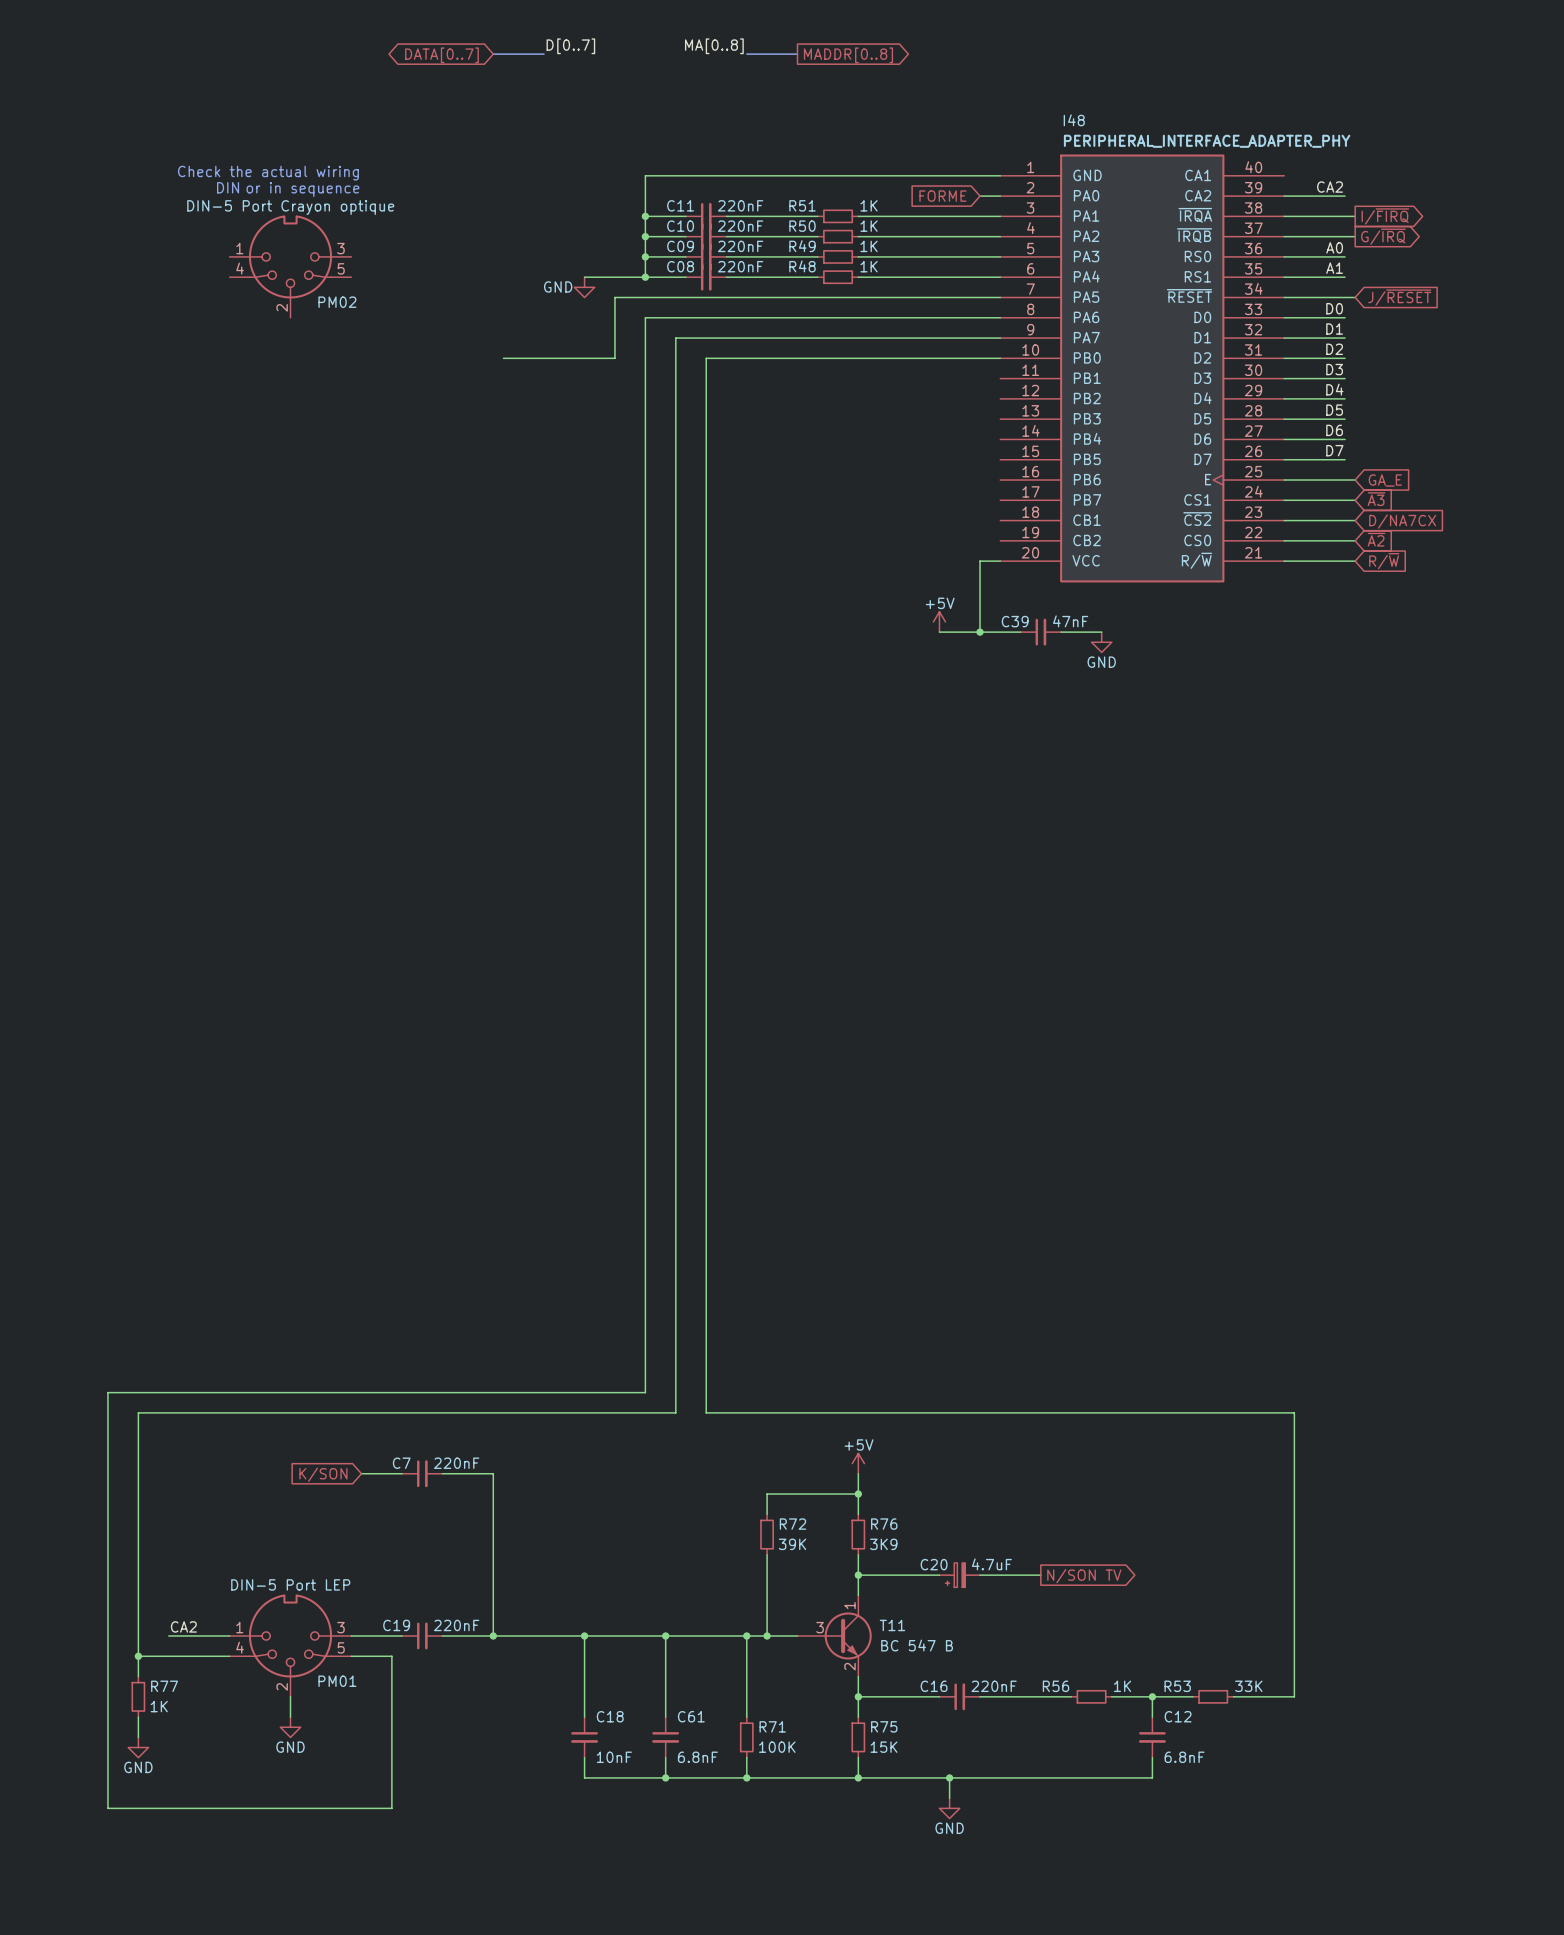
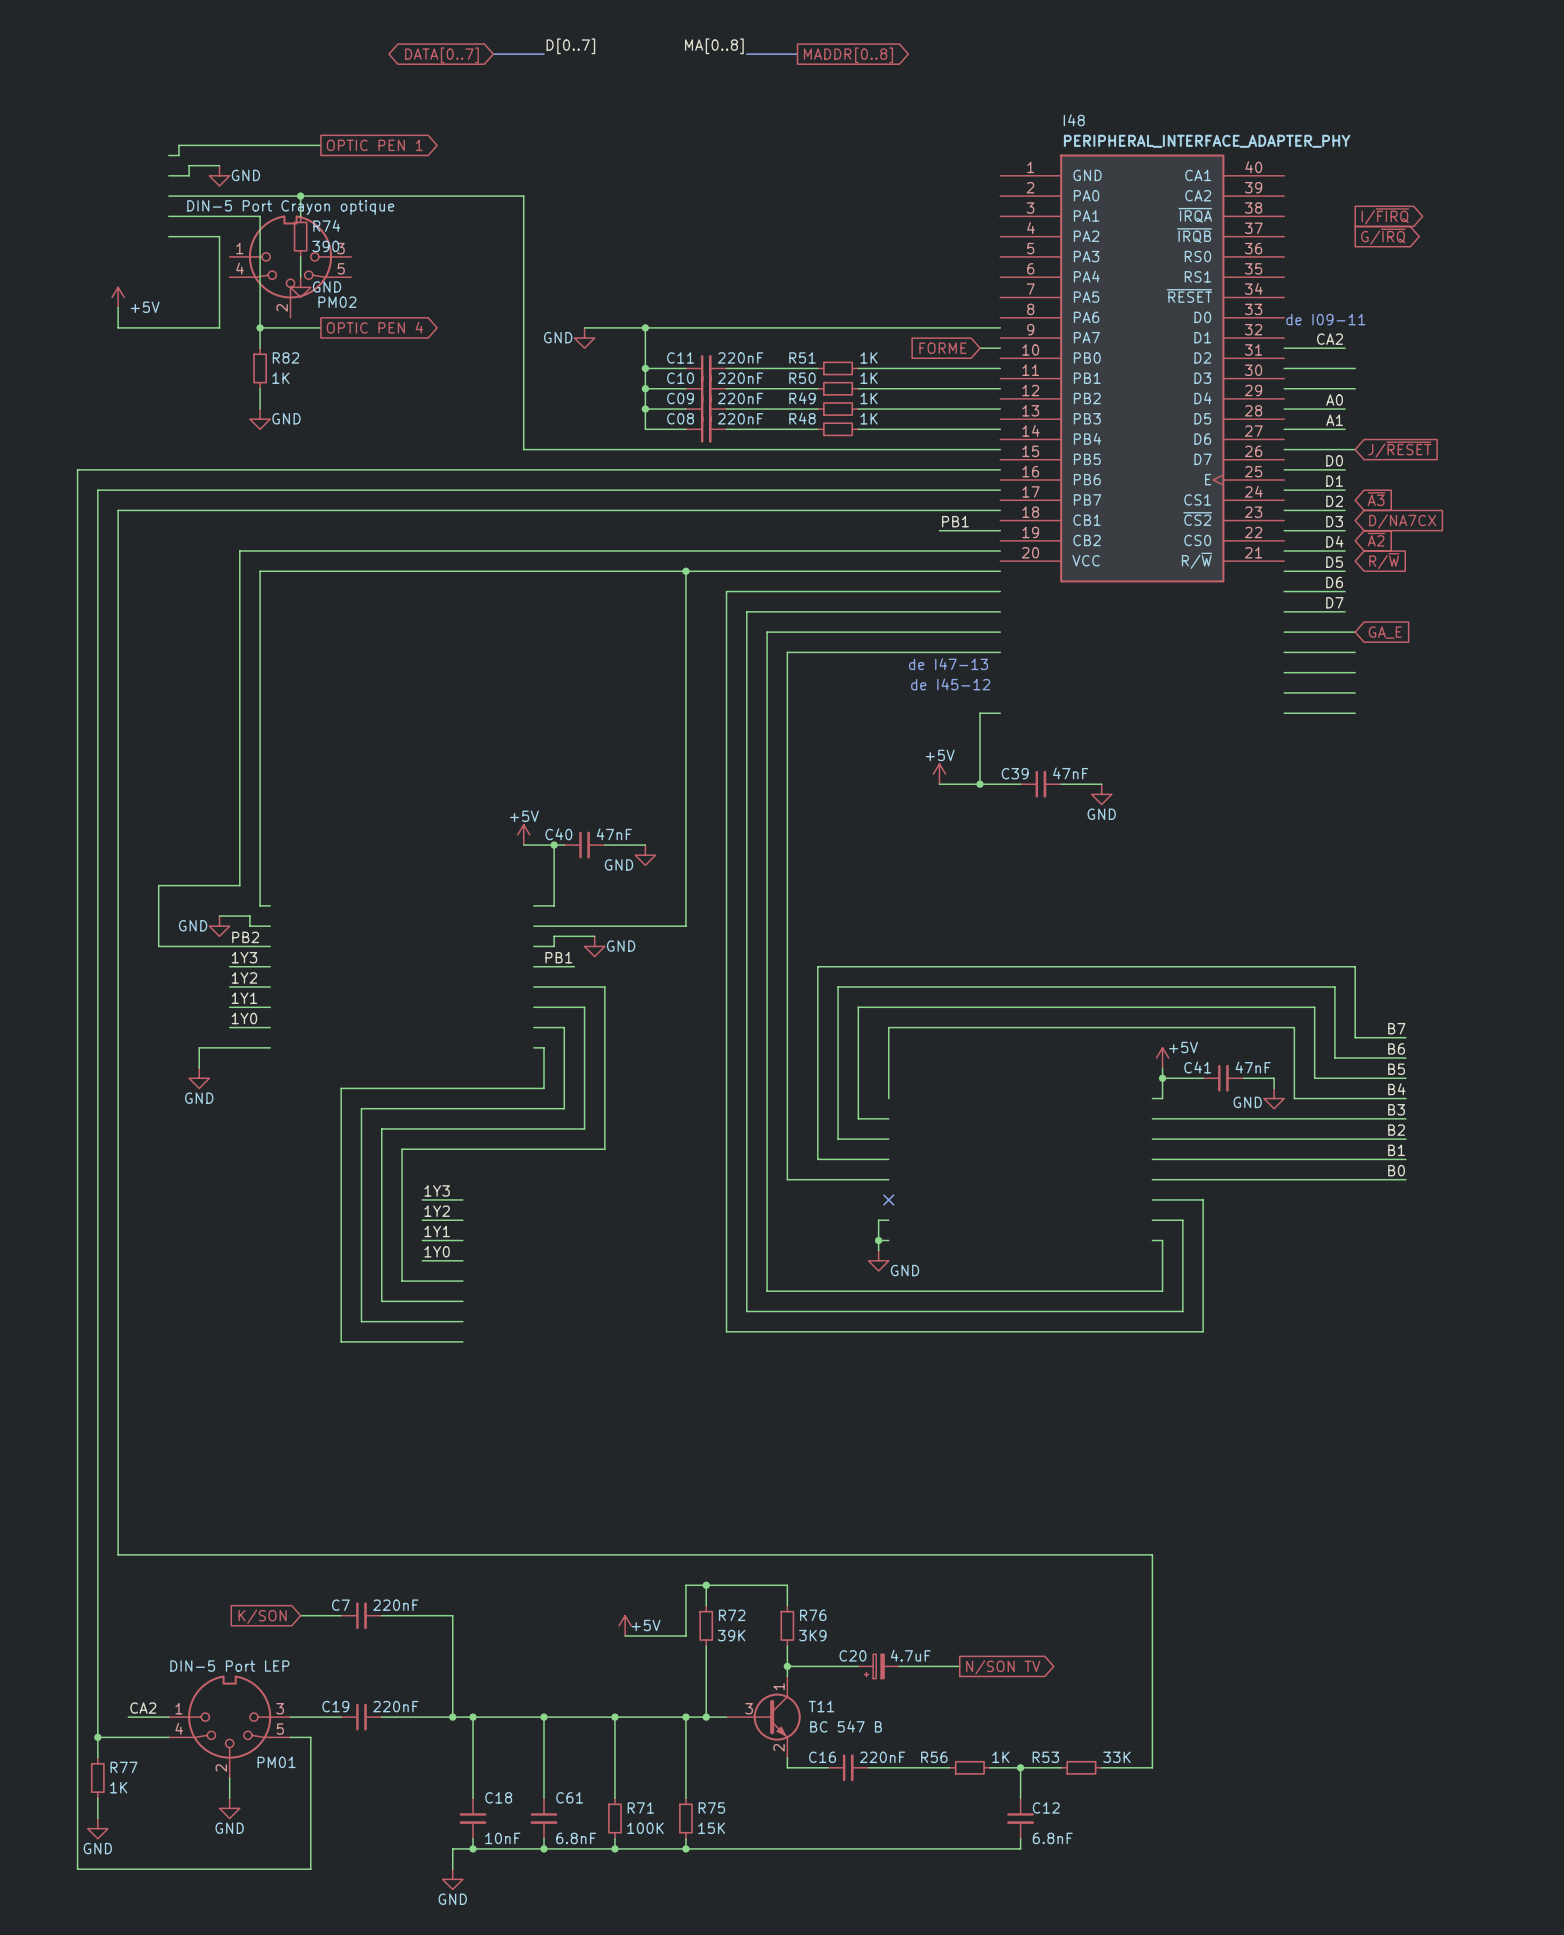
wire: none -> (320, 145) (178, 145) (178, 155) (168, 155)
global label: none -> OPTIC PEN 1 (374, 145)
wire: none -> (219, 165) (189, 165) (189, 175) (168, 175)
text: Check the actual wiring (268, 173) -> none
power symbol: none -> GND (219, 175)
wire: (1000, 175) (645, 175) (645, 277) -> none
label position: CA2 (1330, 187) -> CA2 (1330, 339)
text: DIN or in sequence (288, 189) -> none
wire: none -> (168, 196) (523, 196) (523, 449) (1000, 449)
wire: none -> (300, 196) (300, 216)
junction: none -> (300, 196)
global label position: FORME (942, 196) -> FORME (942, 348)
wire: (980, 196) (1000, 196) -> (980, 348) (1000, 348)
wire: (1284, 196) (1345, 196) -> (1284, 348) (1345, 348)
wire: none -> (168, 216) (260, 216) (260, 348)
wire: (645, 216) (685, 216) -> (645, 368) (685, 368)
junction: (645, 216) -> none
C11 position: (706, 216) -> (706, 368)
wire: (726, 216) (817, 216) -> (726, 368) (817, 368)
R51 position: (838, 216) -> (838, 368)
wire: (858, 216) (1000, 216) -> (858, 368) (1000, 368)
wire: (1284, 216) (1355, 216) -> (1284, 368) (1355, 368)
wire: none -> (168, 236) (219, 236) (219, 327) (118, 327) (118, 307)
R74: none -> 390 (300, 236)
wire: (645, 236) (685, 236) -> (645, 388) (685, 388)
junction: (645, 236) -> none
C10 position: (706, 236) -> (706, 388)
wire: (726, 236) (817, 236) -> (726, 388) (817, 388)
R50 position: (838, 236) -> (838, 388)
wire: (858, 236) (1000, 236) -> (858, 388) (1000, 388)
wire: (1284, 236) (1355, 236) -> (1284, 388) (1355, 388)
label position: A0 (1334, 247) -> A0 (1334, 399)
wire: none -> (300, 256) (300, 277)
wire: (645, 256) (685, 256) -> (645, 409) (685, 409)
junction: (645, 256) -> none
C09 position: (706, 256) -> (706, 409)
wire: (726, 256) (817, 256) -> (726, 409) (817, 409)
R49 position: (838, 256) -> (838, 409)
wire: (858, 256) (1000, 256) -> (858, 409) (1000, 409)
wire: (1284, 256) (1345, 256) -> (1284, 409) (1345, 409)
label position: A1 (1334, 268) -> A1 (1334, 420)
wire: (584, 277) (685, 277) -> none
junction: (645, 277) -> none
C08 position: (706, 277) -> (706, 429)
wire: (726, 277) (817, 277) -> (726, 429) (817, 429)
R48 position: (838, 277) -> (838, 429)
wire: (858, 277) (1000, 277) -> (858, 429) (1000, 429)
wire: (1284, 277) (1345, 277) -> (1284, 429) (1345, 429)
power symbol: none -> GND (300, 287)
power symbol position: GND (584, 287) -> GND (584, 338)
power symbol: none -> +5V (118, 297)
wire: (1000, 297) (614, 297) (614, 358) (503, 358) -> none
wire: (1284, 297) (1355, 297) -> (1284, 449) (1355, 449)
global label position: J/~{RESET} (1399, 297) -> J/~{RESET} (1399, 449)
label position: D0 (1334, 308) -> D0 (1334, 460)
wire: (1000, 317) (645, 317) (645, 327) -> none
wire: (1284, 317) (1345, 317) -> (1284, 469) (1345, 469)
text: none -> de I09-11 (1325, 319)
wire: none -> (260, 327) (320, 327)
junction: none -> (260, 327)
global label: none -> OPTIC PEN 4 (375, 327)
wire: none -> (584, 327) (1000, 327)
junction: none -> (645, 327)
label position: D1 (1334, 329) -> D1 (1334, 481)
wire: (1000, 338) (675, 338) (675, 1412) (138, 1412) (138, 1676) -> none
wire: (1284, 338) (1345, 338) -> (1284, 490) (1345, 490)
label position: D2 (1334, 349) -> D2 (1334, 501)
wire: (1000, 358) (706, 358) (706, 1412) (1294, 1412) (1294, 1696) (1233, 1696) -> none
wire: (1284, 358) (1345, 358) -> (1284, 510) (1345, 510)
R82: none -> 1K (260, 368)
junction: none -> (645, 368)
label position: D3 (1334, 369) -> D3 (1334, 521)
wire: (1284, 378) (1345, 378) -> (1284, 530) (1345, 530)
wire: none -> (260, 388) (260, 409)
junction: none -> (645, 388)
label position: D4 (1334, 389) -> D4 (1334, 541)
wire: (1284, 398) (1345, 398) -> (1284, 550) (1345, 550)
junction: none -> (645, 409)
label position: D5 (1334, 410) -> D5 (1334, 562)
power symbol: none -> GND (260, 419)
wire: (1284, 419) (1345, 419) -> (1284, 571) (1345, 571)
wire: (645, 429) (645, 1392) (107, 1392) (107, 1808) (391, 1808) (391, 1656) (351, 1656) -> (645, 429) (685, 429)
label position: D6 (1334, 430) -> D6 (1334, 582)
wire: (1284, 439) (1345, 439) -> (1284, 591) (1345, 591)
label position: D7 (1334, 450) -> D7 (1334, 602)
wire: (1284, 459) (1345, 459) -> (1284, 611) (1345, 611)
wire: none -> (1000, 469) (77, 469) (77, 1869) (310, 1869) (310, 1737) (290, 1737)
wire: (1284, 480) (1355, 480) -> (1284, 632) (1355, 632)
global label position: GA_E (1385, 480) -> GA_E (1385, 632)
wire: none -> (1000, 490) (97, 490) (97, 1757)
wire: (1284, 500) (1355, 500) -> (1284, 652) (1355, 652)
wire: none -> (1000, 510) (118, 510) (118, 1554) (1152, 1554) (1152, 1696)
wire: (1284, 520) (1355, 520) -> (1284, 672) (1355, 672)
label: none -> PB1 (955, 521)
wire: none -> (939, 530) (1000, 530)
wire: (1284, 540) (1355, 540) -> (1284, 692) (1355, 692)
wire: none -> (1000, 550) (239, 550) (239, 885) (158, 885) (158, 946) (270, 946)
wire: (1000, 561) (980, 561) (980, 632) -> (1000, 713) (980, 713) (980, 784)
wire: (1284, 561) (1355, 561) -> (1284, 713) (1355, 713)
wire: none -> (685, 571) (685, 926) (533, 926)
junction: none -> (685, 571)
wire: none -> (1000, 571) (260, 571) (260, 905) (270, 905)
wire: none -> (1000, 591) (726, 591) (726, 1331) (1203, 1331) (1203, 1199) (1152, 1199)
wire: none -> (1000, 611) (746, 611) (746, 1311) (1182, 1311) (1182, 1220) (1152, 1220)
power symbol position: +5V (939, 621) -> +5V (939, 774)
wire: none -> (939, 632) (767, 632) (767, 1291) (1162, 1291) (1162, 1240) (1152, 1240)
junction: (980, 632) -> none
wire: (1000, 632) (1020, 632) -> none
C39 position: (1040, 632) -> (1040, 784)
wire: (1061, 632) (1101, 632) -> (1061, 784) (1101, 784)
power symbol position: GND (1101, 642) -> GND (1101, 794)
wire: none -> (1000, 652) (787, 652) (787, 1179) (888, 1179)
text: none -> de I47-13 (948, 664)
text: none -> de I45-12 (950, 684)
wire: none -> (939, 784) (1020, 784)
junction: none -> (980, 784)
power symbol: none -> +5V (523, 834)
wire: none -> (523, 845) (564, 845)
wire: none -> (554, 845) (554, 905) (533, 905)
junction: none -> (554, 845)
C40: none -> 47nF (584, 845)
wire: none -> (604, 845) (645, 845)
power symbol: none -> GND (645, 855)
wire: none -> (219, 916) (249, 916) (249, 926) (270, 926)
power symbol: none -> GND (219, 926)
wire: none -> (594, 936) (554, 936) (554, 946) (533, 946)
label: none -> PB2 (245, 937)
power symbol: none -> GND (594, 946)
label: none -> 1Y3 (244, 957)
label: none -> PB1 (558, 957)
wire: none -> (229, 966) (270, 966)
wire: none -> (533, 966) (574, 966)
label: none -> 1Y2 (244, 977)
wire: none -> (229, 987) (270, 987)
wire: none -> (533, 987) (604, 987) (604, 1149) (402, 1149) (402, 1281) (462, 1281)
label: none -> 1Y1 (244, 998)
wire: none -> (229, 1007) (270, 1007)
wire: none -> (533, 1007) (584, 1007) (584, 1128) (381, 1128) (381, 1301) (462, 1301)
label: none -> 1Y0 (244, 1018)
wire: none -> (229, 1027) (270, 1027)
wire: none -> (533, 1027) (564, 1027) (564, 1108) (361, 1108) (361, 1321) (462, 1321)
label: none -> B7 (1396, 1028)
wire: none -> (1405, 1037) (1355, 1037) (1355, 966) (817, 966) (817, 1159) (888, 1159)
wire: none -> (270, 1047) (199, 1047) (199, 1068)
wire: none -> (533, 1047) (543, 1047) (543, 1088) (341, 1088) (341, 1341) (462, 1341)
label: none -> B6 (1396, 1048)
power symbol: none -> +5V (1162, 1058)
wire: none -> (1405, 1058) (1334, 1058) (1334, 987) (838, 987) (838, 1139) (888, 1139)
wire: none -> (1162, 1068) (1162, 1098) (1152, 1098)
label: none -> B5 (1396, 1069)
power symbol: none -> GND (199, 1078)
wire: none -> (1162, 1078) (1203, 1078)
junction: none -> (1162, 1078)
C41: none -> 47nF (1223, 1078)
wire: none -> (1243, 1078) (1274, 1078) (1274, 1088)
wire: none -> (1405, 1078) (1314, 1078) (1314, 1007) (858, 1007) (858, 1118) (888, 1118)
label: none -> B4 (1396, 1089)
wire: none -> (888, 1098) (888, 1027) (1294, 1027) (1294, 1098) (1405, 1098)
power symbol: none -> GND (1274, 1098)
label: none -> B3 (1396, 1109)
wire: none -> (1152, 1118) (1405, 1118)
label: none -> B2 (1396, 1130)
wire: none -> (1152, 1139) (1405, 1139)
label: none -> B1 (1396, 1150)
wire: none -> (1152, 1159) (1405, 1159)
label: none -> B0 (1396, 1170)
wire: none -> (1152, 1179) (1405, 1179)
label: none -> 1Y3 (437, 1190)
wire: none -> (422, 1199) (462, 1199)
no-connect mark: none -> (888, 1199)
label: none -> 1Y2 (437, 1211)
wire: none -> (422, 1220) (462, 1220)
wire: none -> (888, 1220) (878, 1220) (878, 1250)
label: none -> 1Y1 (437, 1231)
wire: none -> (422, 1240) (462, 1240)
wire: none -> (878, 1240) (888, 1240)
junction: none -> (878, 1240)
label: none -> 1Y0 (437, 1251)
wire: none -> (422, 1260) (462, 1260)
power symbol: none -> GND (878, 1260)
power symbol: +5V (858, 1463) -> none
wire: (361, 1473) (402, 1473) -> (300, 1615) (341, 1615)
C7 position: (422, 1473) -> (361, 1615)
wire: (442, 1473) (493, 1473) (493, 1635) -> none
wire: (858, 1473) (858, 1514) -> none
global label position: K/SON (323, 1474) -> K/SON (262, 1616)
wire: (858, 1494) (767, 1494) (767, 1514) -> none
junction: (858, 1494) -> none
R72 position: (767, 1534) -> (706, 1625)
R76 position: (858, 1534) -> (787, 1625)
wire: (767, 1554) (767, 1635) -> none
wire: (858, 1554) (858, 1595) -> none
wire: (858, 1575) (939, 1575) -> none
junction: (858, 1575) -> none
C20 position: (959, 1575) -> (878, 1666)
wire: (980, 1575) (1040, 1575) -> (898, 1666) (959, 1666)
global label position: N/SON TV (1084, 1576) -> N/SON TV (1003, 1667)
junction: none -> (706, 1585)
wire: none -> (381, 1615) (452, 1615) (452, 1717)
power symbol: none -> +5V (625, 1625)
label position: CA2 (183, 1626) -> CA2 (143, 1708)
wire: (168, 1635) (229, 1635) -> none
wire: (351, 1635) (402, 1635) -> none
C19 position: (422, 1635) -> (361, 1717)
wire: (442, 1635) (625, 1635) -> none
junction: (493, 1635) -> none
wire: (584, 1635) (584, 1717) -> (543, 1717) (543, 1798)
junction: (584, 1635) -> none
wire: (665, 1635) (665, 1717) -> (614, 1717) (614, 1798)
junction: (665, 1635) -> none
wire: (685, 1635) (797, 1635) -> (685, 1635) (685, 1585) (787, 1585) (787, 1605)
wire: (746, 1635) (746, 1717) -> (685, 1717) (685, 1798)
junction: (746, 1635) -> none
junction: (767, 1635) -> none
T11 position: (834, 1635) -> (763, 1717)
PM01 position: (290, 1645) -> (229, 1726)
wire: none -> (706, 1646) (706, 1717)
wire: none -> (787, 1646) (787, 1676)
wire: (138, 1656) (229, 1656) -> none
junction: (138, 1656) -> none
wire: none -> (787, 1666) (858, 1666)
junction: none -> (787, 1666)
wire: (858, 1676) (858, 1717) -> none
R77 position: (138, 1696) -> (97, 1777)
wire: (290, 1696) (290, 1717) -> (341, 1717) (290, 1717)
wire: (858, 1696) (939, 1696) -> (868, 1767) (949, 1767)
junction: (858, 1696) -> none
C16 position: (959, 1696) -> (848, 1767)
wire: (980, 1696) (1071, 1696) -> none
R56 position: (1091, 1696) -> (969, 1767)
wire: (1111, 1696) (1192, 1696) -> none
junction: (1152, 1696) -> none
R53 position: (1213, 1696) -> (1081, 1767)
C12 name position: C12 (1178, 1716) -> C12 (1046, 1807)
wire: none -> (128, 1717) (168, 1717)
wire: (138, 1717) (138, 1737) -> (97, 1798) (97, 1818)
wire: none -> (381, 1717) (726, 1717)
junction: none -> (452, 1717)
wire: none -> (473, 1717) (473, 1798)
junction: none -> (473, 1717)
junction: none -> (543, 1717)
junction: none -> (614, 1717)
junction: none -> (685, 1717)
junction: none -> (706, 1717)
power symbol: GND (290, 1727) -> none
wire: none -> (97, 1737) (168, 1737)
junction: none -> (97, 1737)
C18 position: (584, 1737) -> (473, 1818)
C61 position: (665, 1737) -> (543, 1818)
R71 position: (746, 1737) -> (614, 1818)
R75 position: (858, 1737) -> (685, 1818)
C12 position: (1152, 1737) -> (1020, 1818)
power symbol: GND (138, 1747) -> none
wire: (584, 1757) (584, 1777) (1152, 1777) (1152, 1767) -> (1101, 1767) (1152, 1767)
wire: (665, 1757) (665, 1777) -> (706, 1585) (706, 1605)
wire: (746, 1757) (746, 1777) -> none
wire: none -> (787, 1757) (787, 1767) (827, 1767)
wire: (858, 1757) (858, 1777) -> none
wire: none -> (990, 1767) (1061, 1767)
wire: none -> (1020, 1767) (1020, 1798)
junction: none -> (1020, 1767)
wire: none -> (229, 1777) (229, 1798)
junction: (665, 1777) -> none
junction: (746, 1777) -> none
junction: (858, 1777) -> none
wire: (949, 1777) (949, 1798) -> none
junction: (949, 1777) -> none
power symbol: none -> GND (229, 1808)
power symbol: GND (949, 1808) -> none
power symbol: none -> GND (97, 1828)
wire: none -> (473, 1838) (473, 1848)
wire: none -> (543, 1838) (543, 1848)
wire: none -> (614, 1838) (614, 1848)
wire: none -> (685, 1838) (685, 1848)
wire: none -> (1020, 1838) (1020, 1848) (452, 1848) (452, 1869)
junction: none -> (473, 1848)
junction: none -> (543, 1848)
junction: none -> (614, 1848)
junction: none -> (685, 1848)
power symbol: none -> GND (452, 1879)

